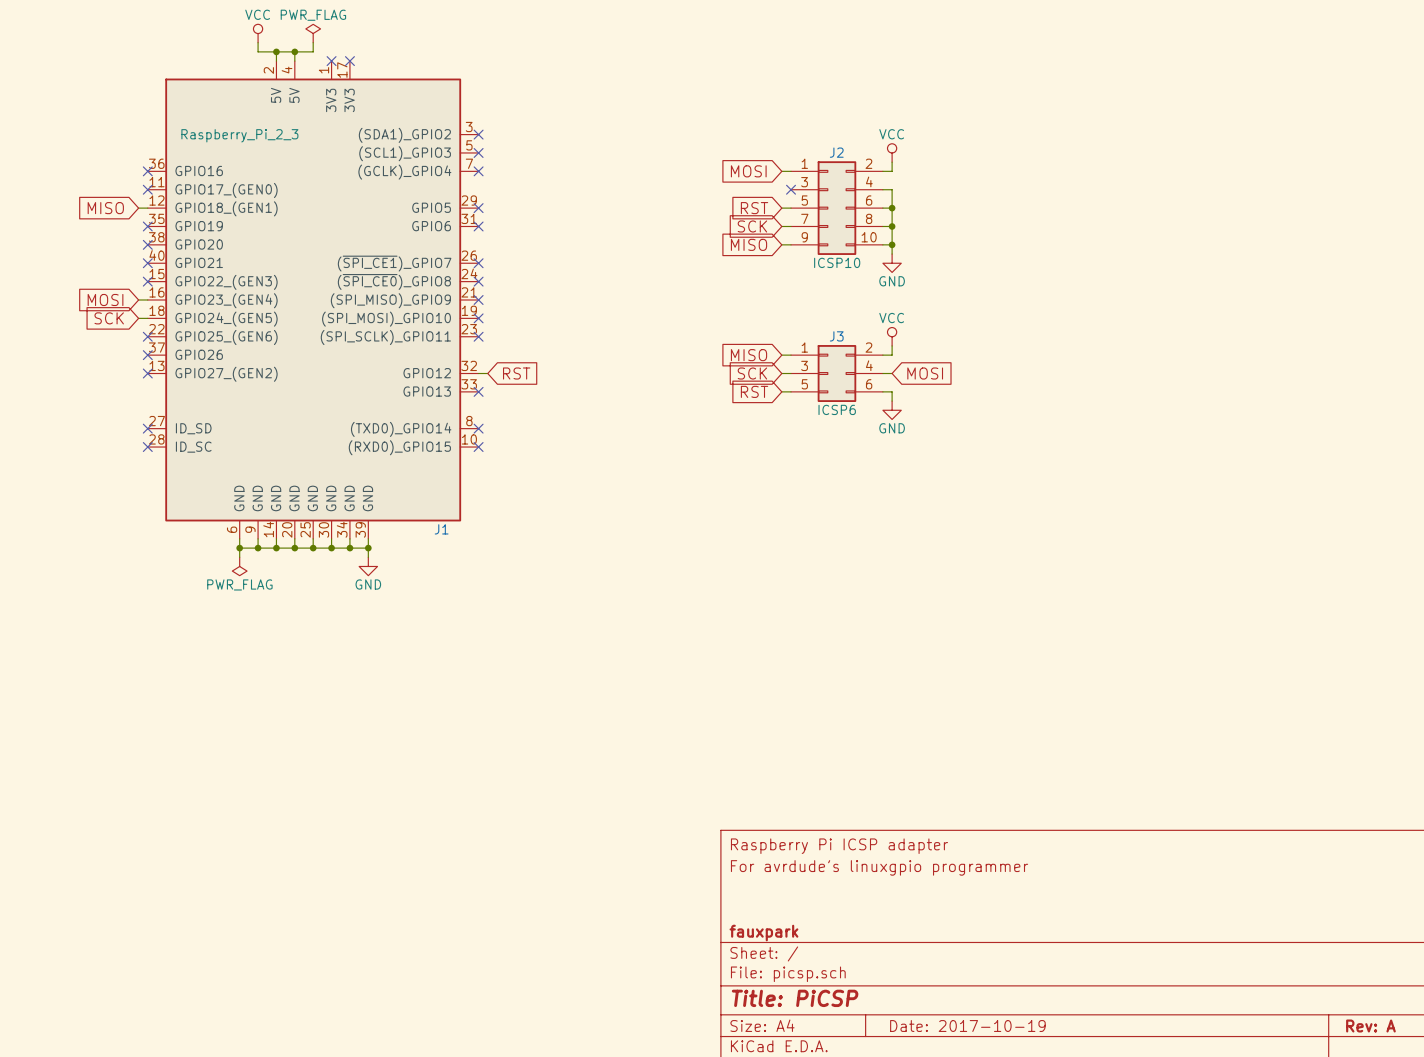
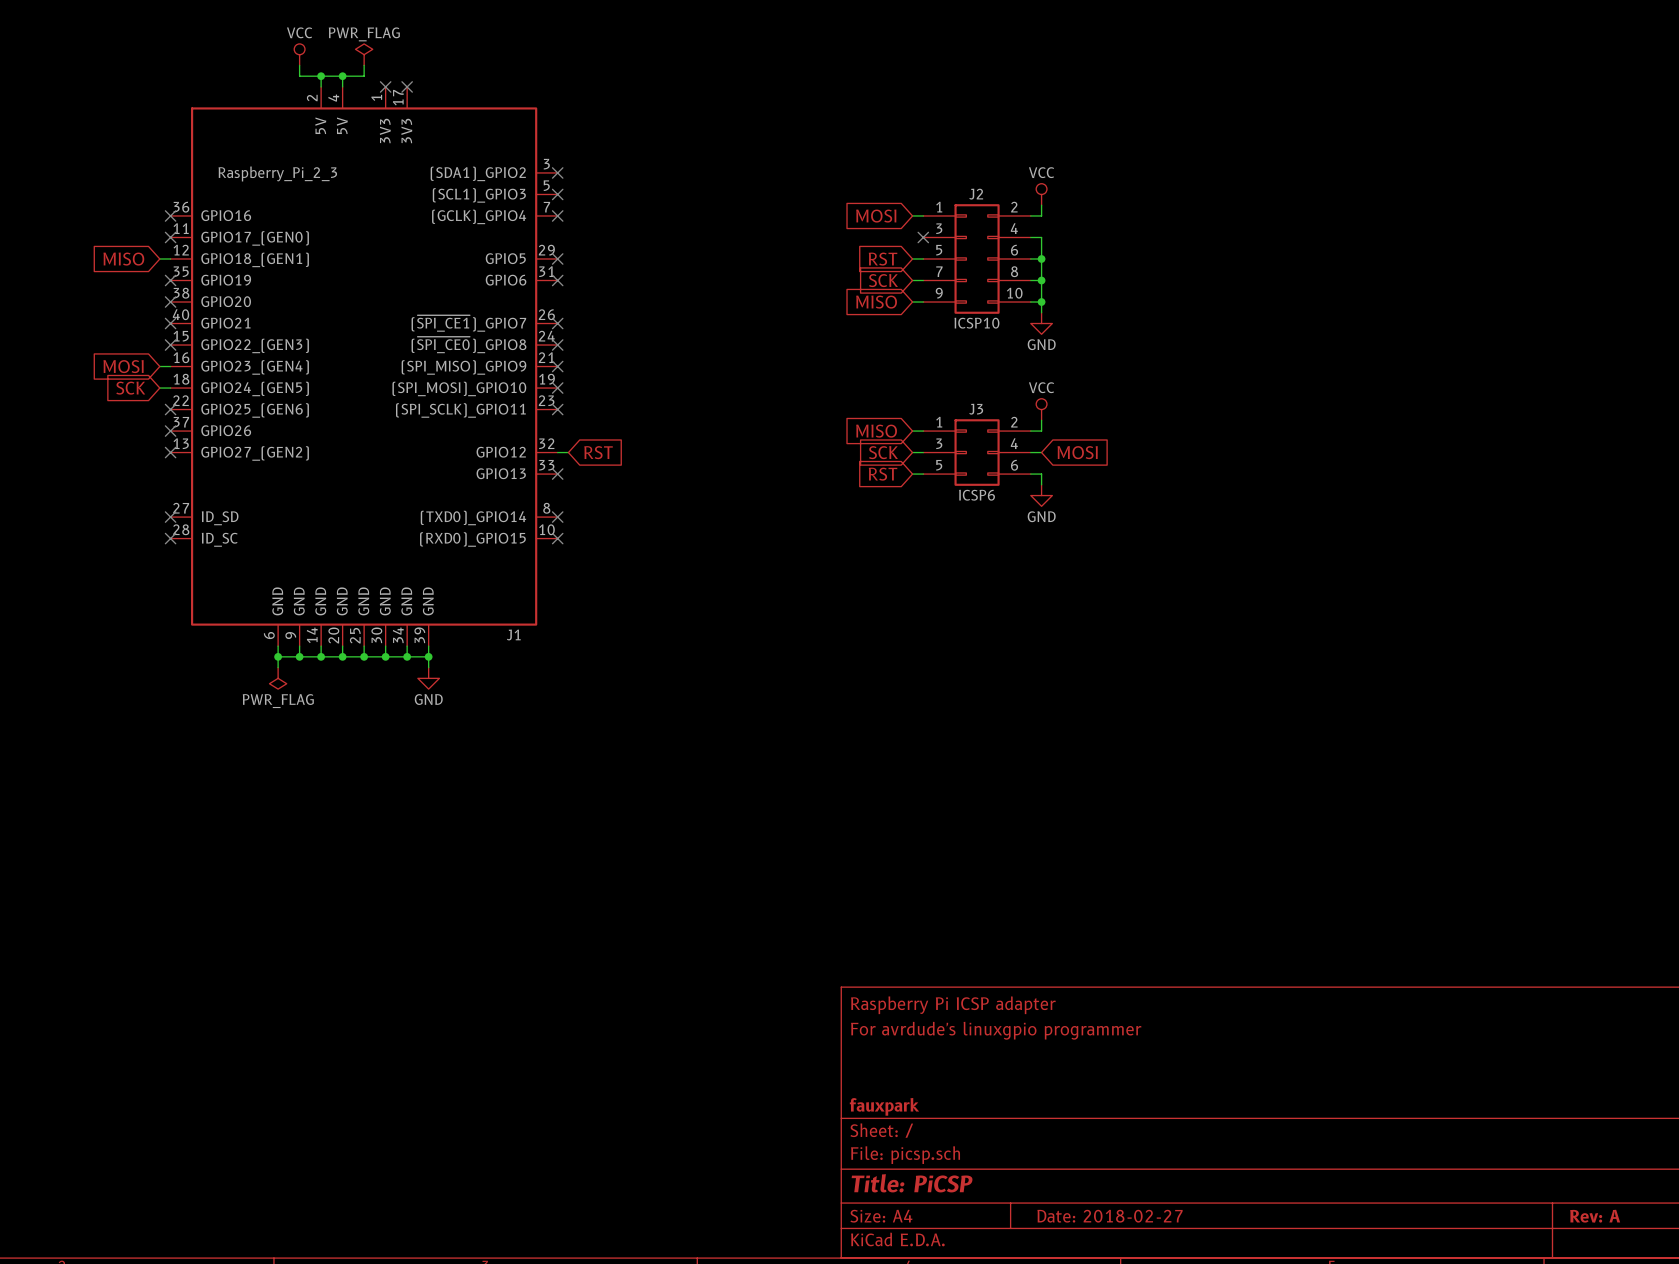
title block: Date: 2017-10-19 (967, 1026) -> Date: 2018-02-27 (1110, 1216)

